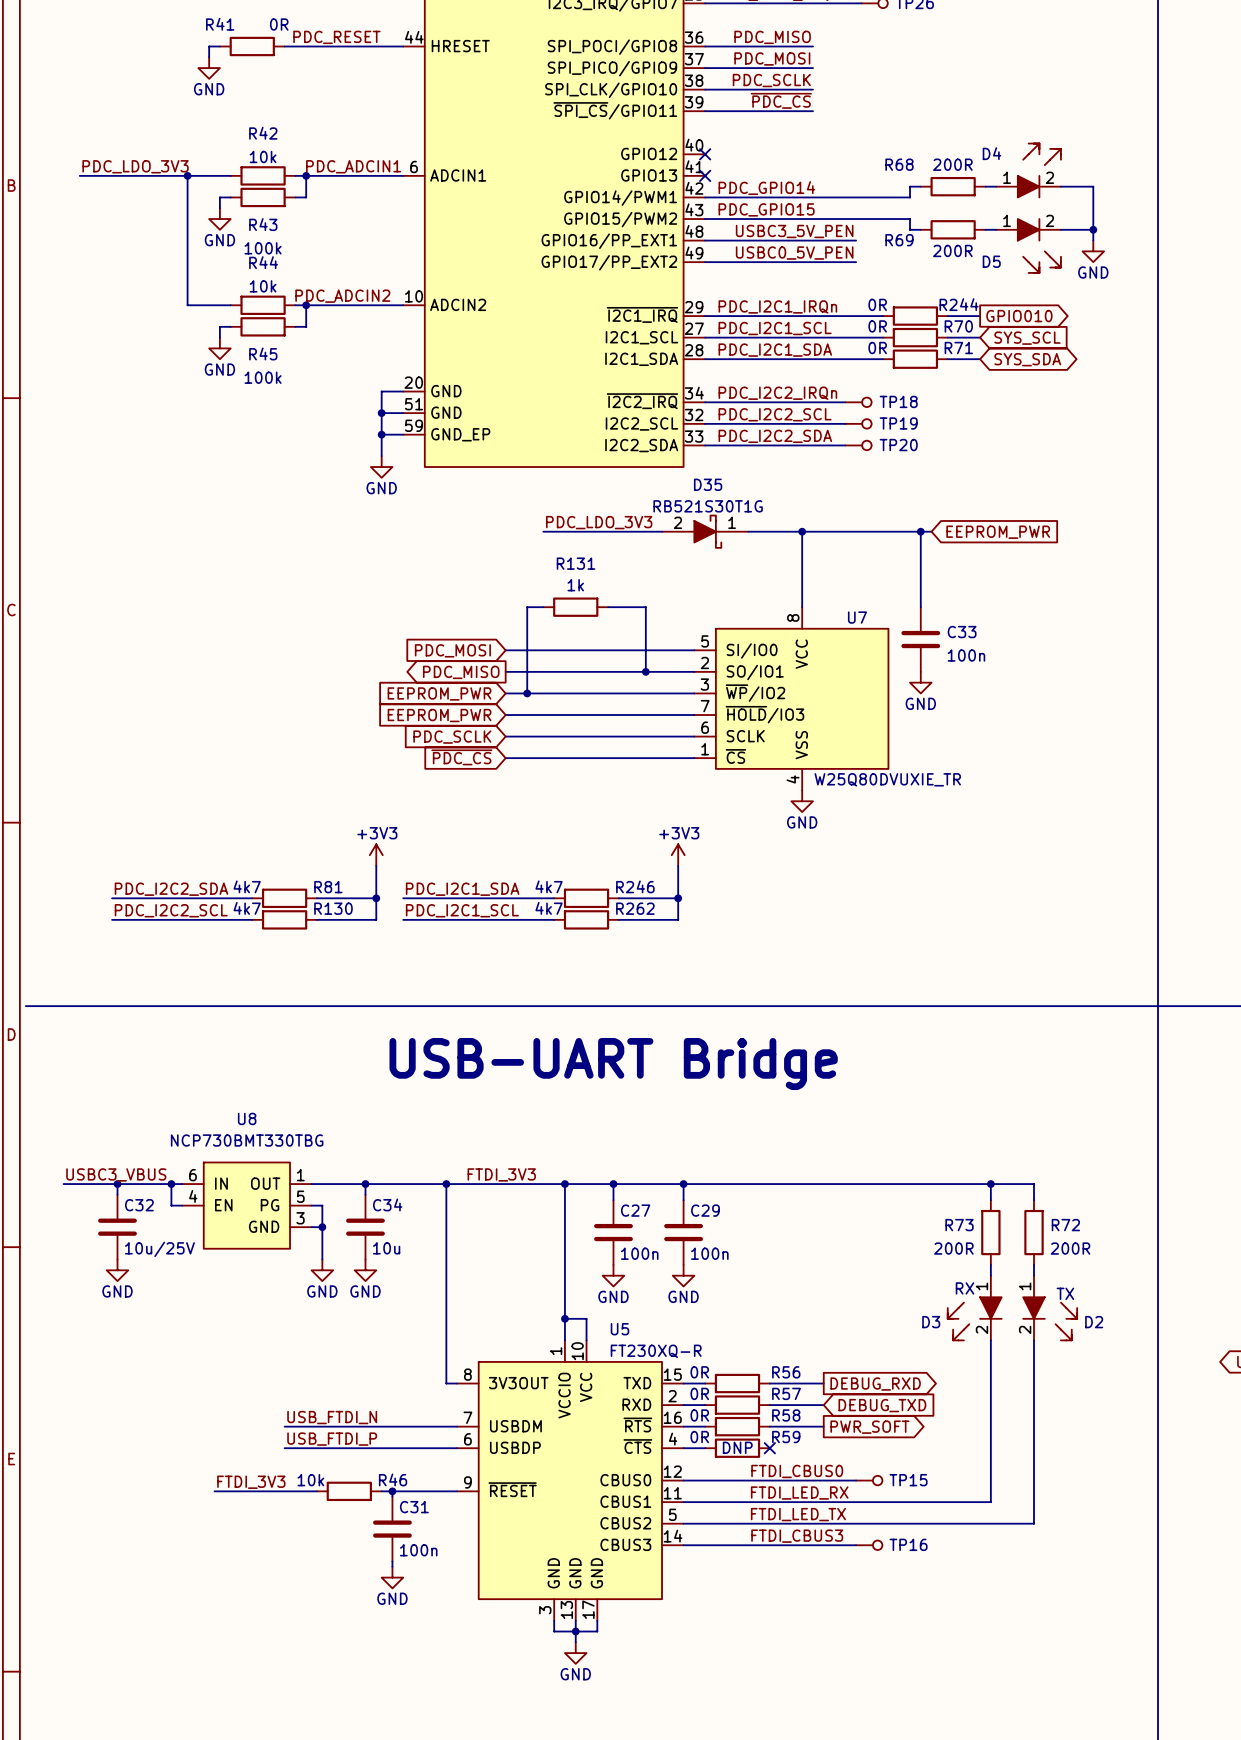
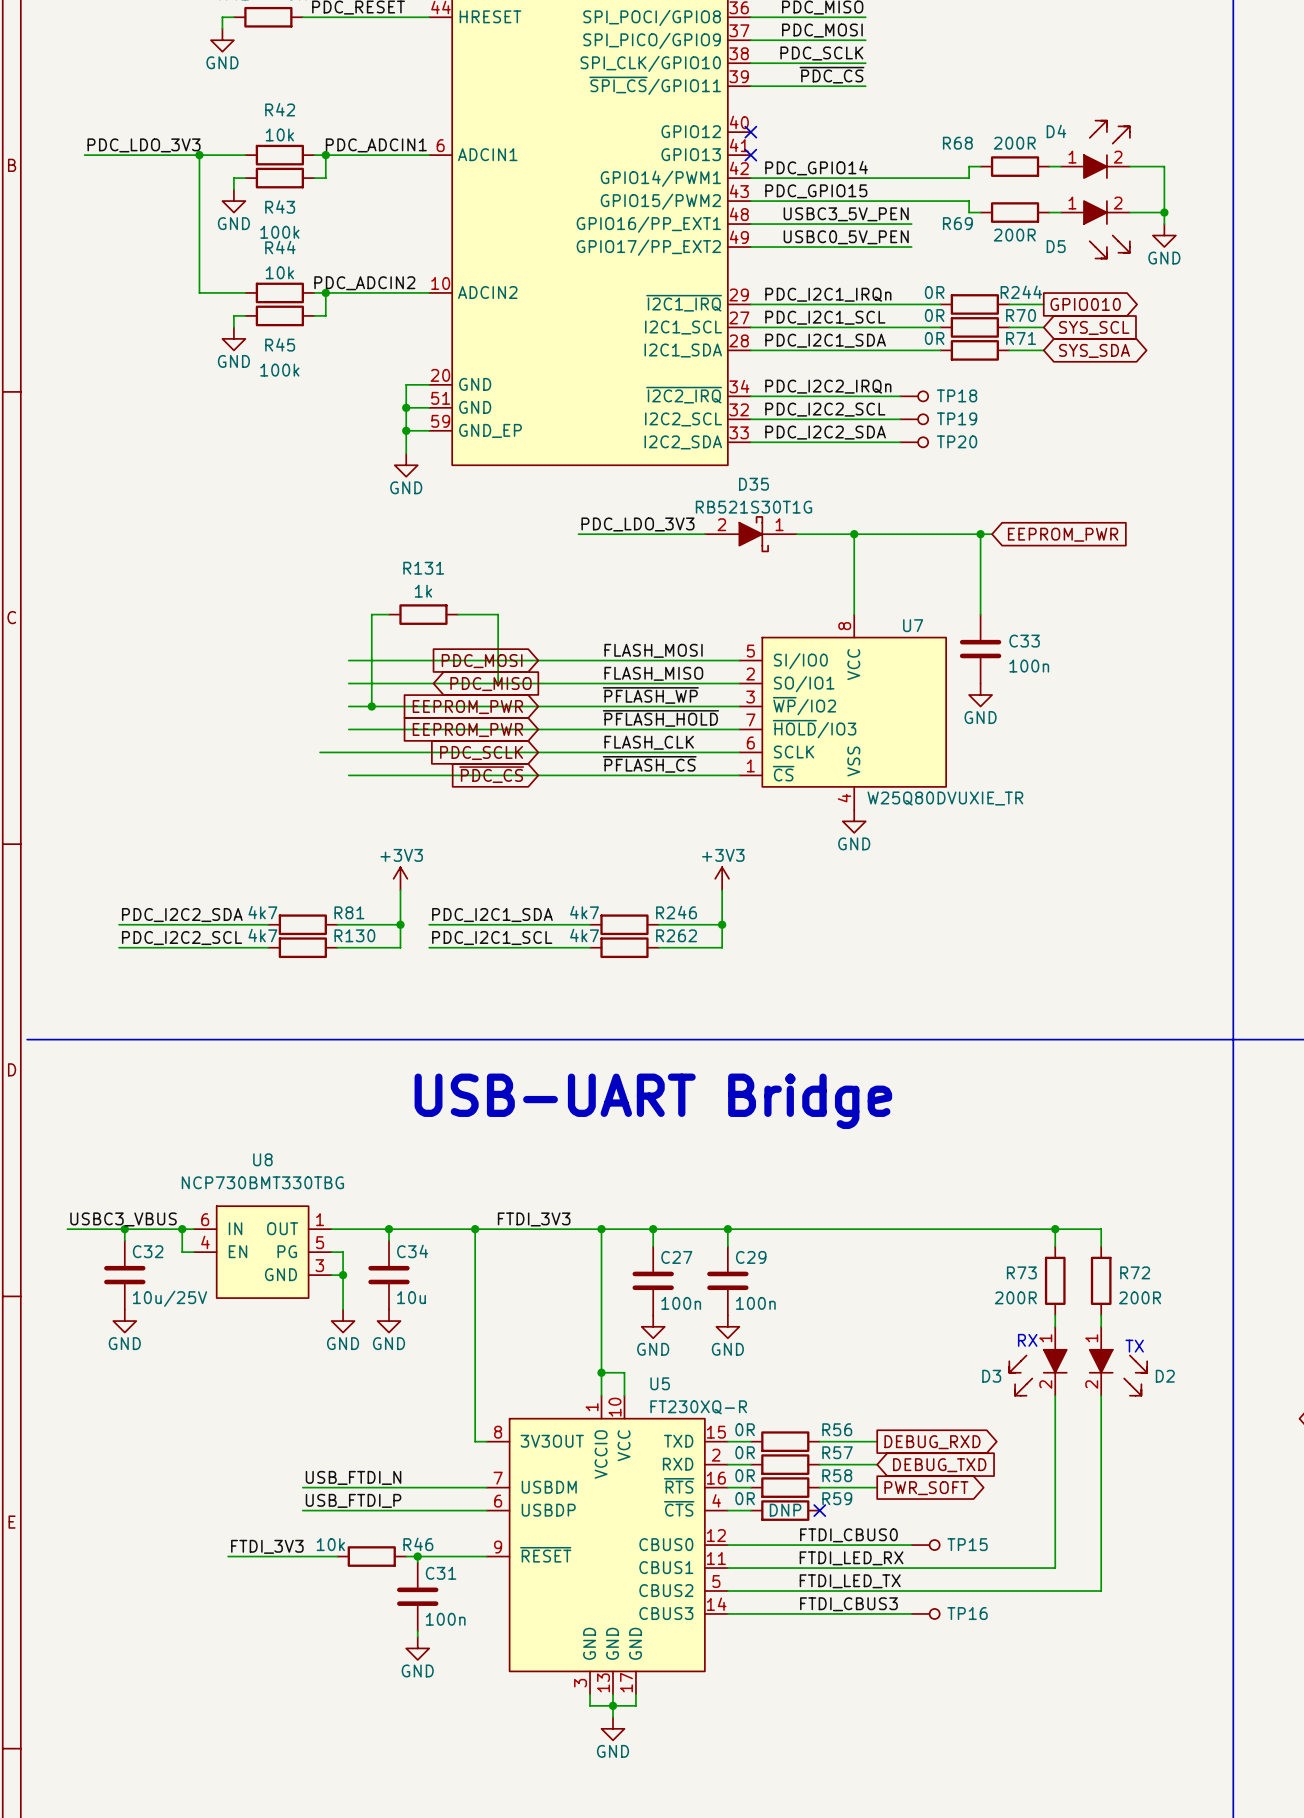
wire: (543, 607) (527, 607) (527, 693) -> (389, 614) (371, 614) (371, 706)
R131 position: (575, 607) -> (423, 614)
wire: (608, 607) (645, 607) (645, 671) -> (457, 614) (498, 614) (498, 683)
label: none -> FLASH_MOSI (653, 650)
wire: none -> (348, 660) (538, 660)
label: none -> FLASH_MISO (653, 673)
wire: none -> (348, 683) (538, 683)
junction: (645, 671) -> none
label: none -> ~{PFLASH_WP} (650, 695)
wire: none -> (348, 706) (538, 706)
junction: none -> (371, 706)
junction: (527, 693) -> none
label: none -> ~{PFLASH_HOLD} (660, 718)
wire: none -> (348, 729) (538, 729)
label: none -> FLASH_CLK (649, 742)
wire: none -> (320, 752) (538, 752)
label: none -> ~{PFLASH_CS} (649, 764)
wire: none -> (348, 775) (538, 775)

